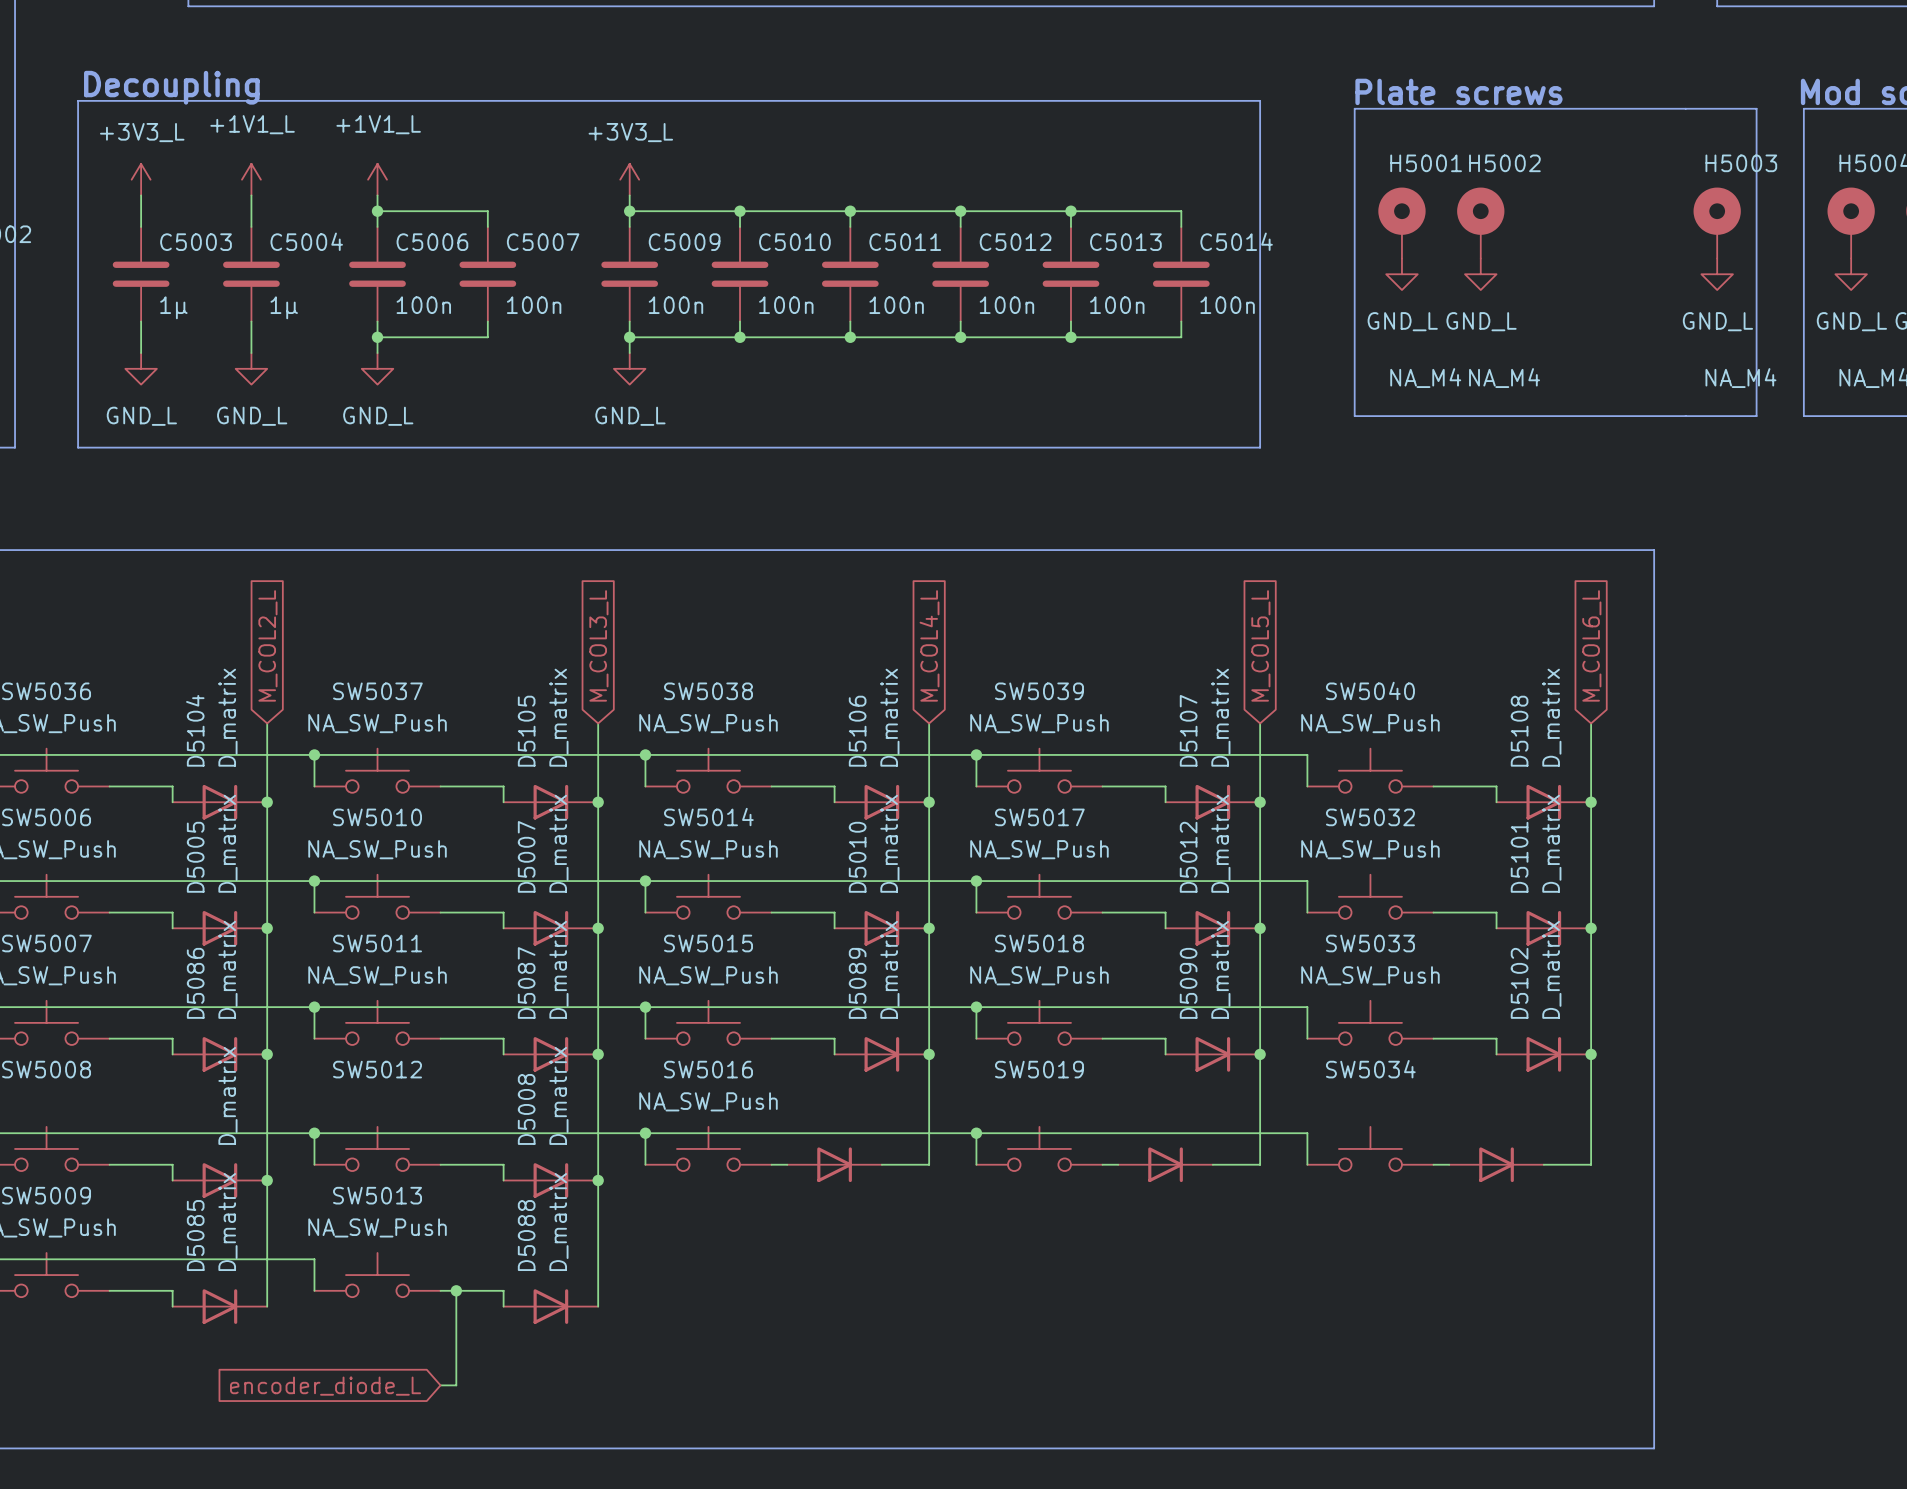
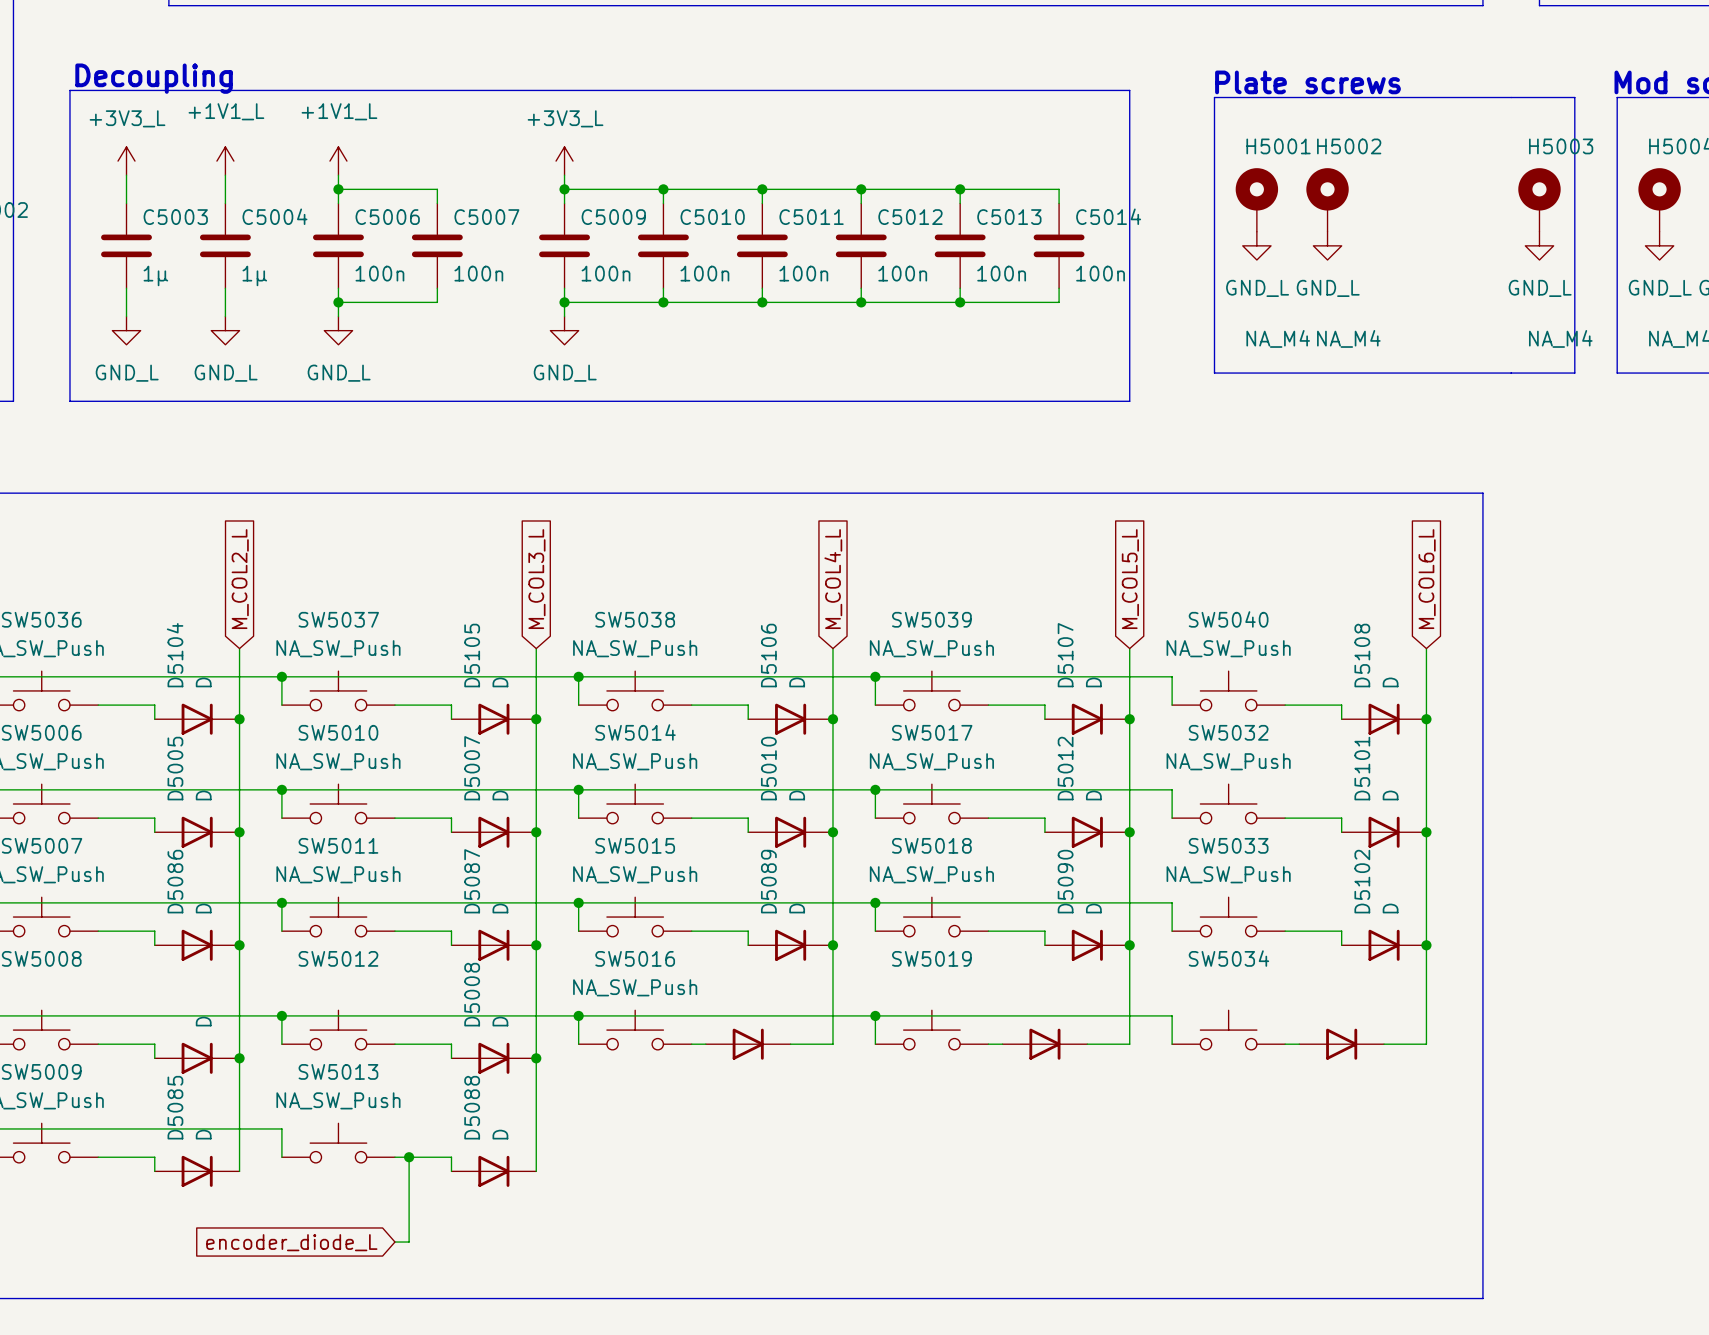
D5104 value: D_matrix (227, 717) -> D (203, 682)
D5105 value: D_matrix (558, 717) -> D (500, 682)
D5106 value: D_matrix (889, 717) -> D (797, 682)
D5107 value: D_matrix (1220, 717) -> D (1093, 682)
D5108 value: D_matrix (1551, 717) -> D (1390, 682)
D5005 value: D_matrix (227, 843) -> D (203, 795)
D5007 value: D_matrix (558, 843) -> D (500, 795)
D5010 value: D_matrix (889, 843) -> D (797, 795)
D5012 value: D_matrix (1220, 843) -> D (1093, 795)
D5101 value: D_matrix (1551, 843) -> D (1390, 795)
D5086 value: D_matrix (227, 969) -> D (203, 908)
D5087 value: D_matrix (558, 969) -> D (500, 908)
D5089 value: D_matrix (889, 969) -> D (797, 908)
D5090 value: D_matrix (1220, 969) -> D (1093, 908)
D5102 value: D_matrix (1551, 969) -> D (1390, 908)
part value: D_matrix (227, 1095) -> D (203, 1021)
D5008 value: D_matrix (558, 1095) -> D (500, 1021)
D5085 value: D_matrix (227, 1222) -> D (203, 1134)
D5088 value: D_matrix (558, 1222) -> D (500, 1134)

